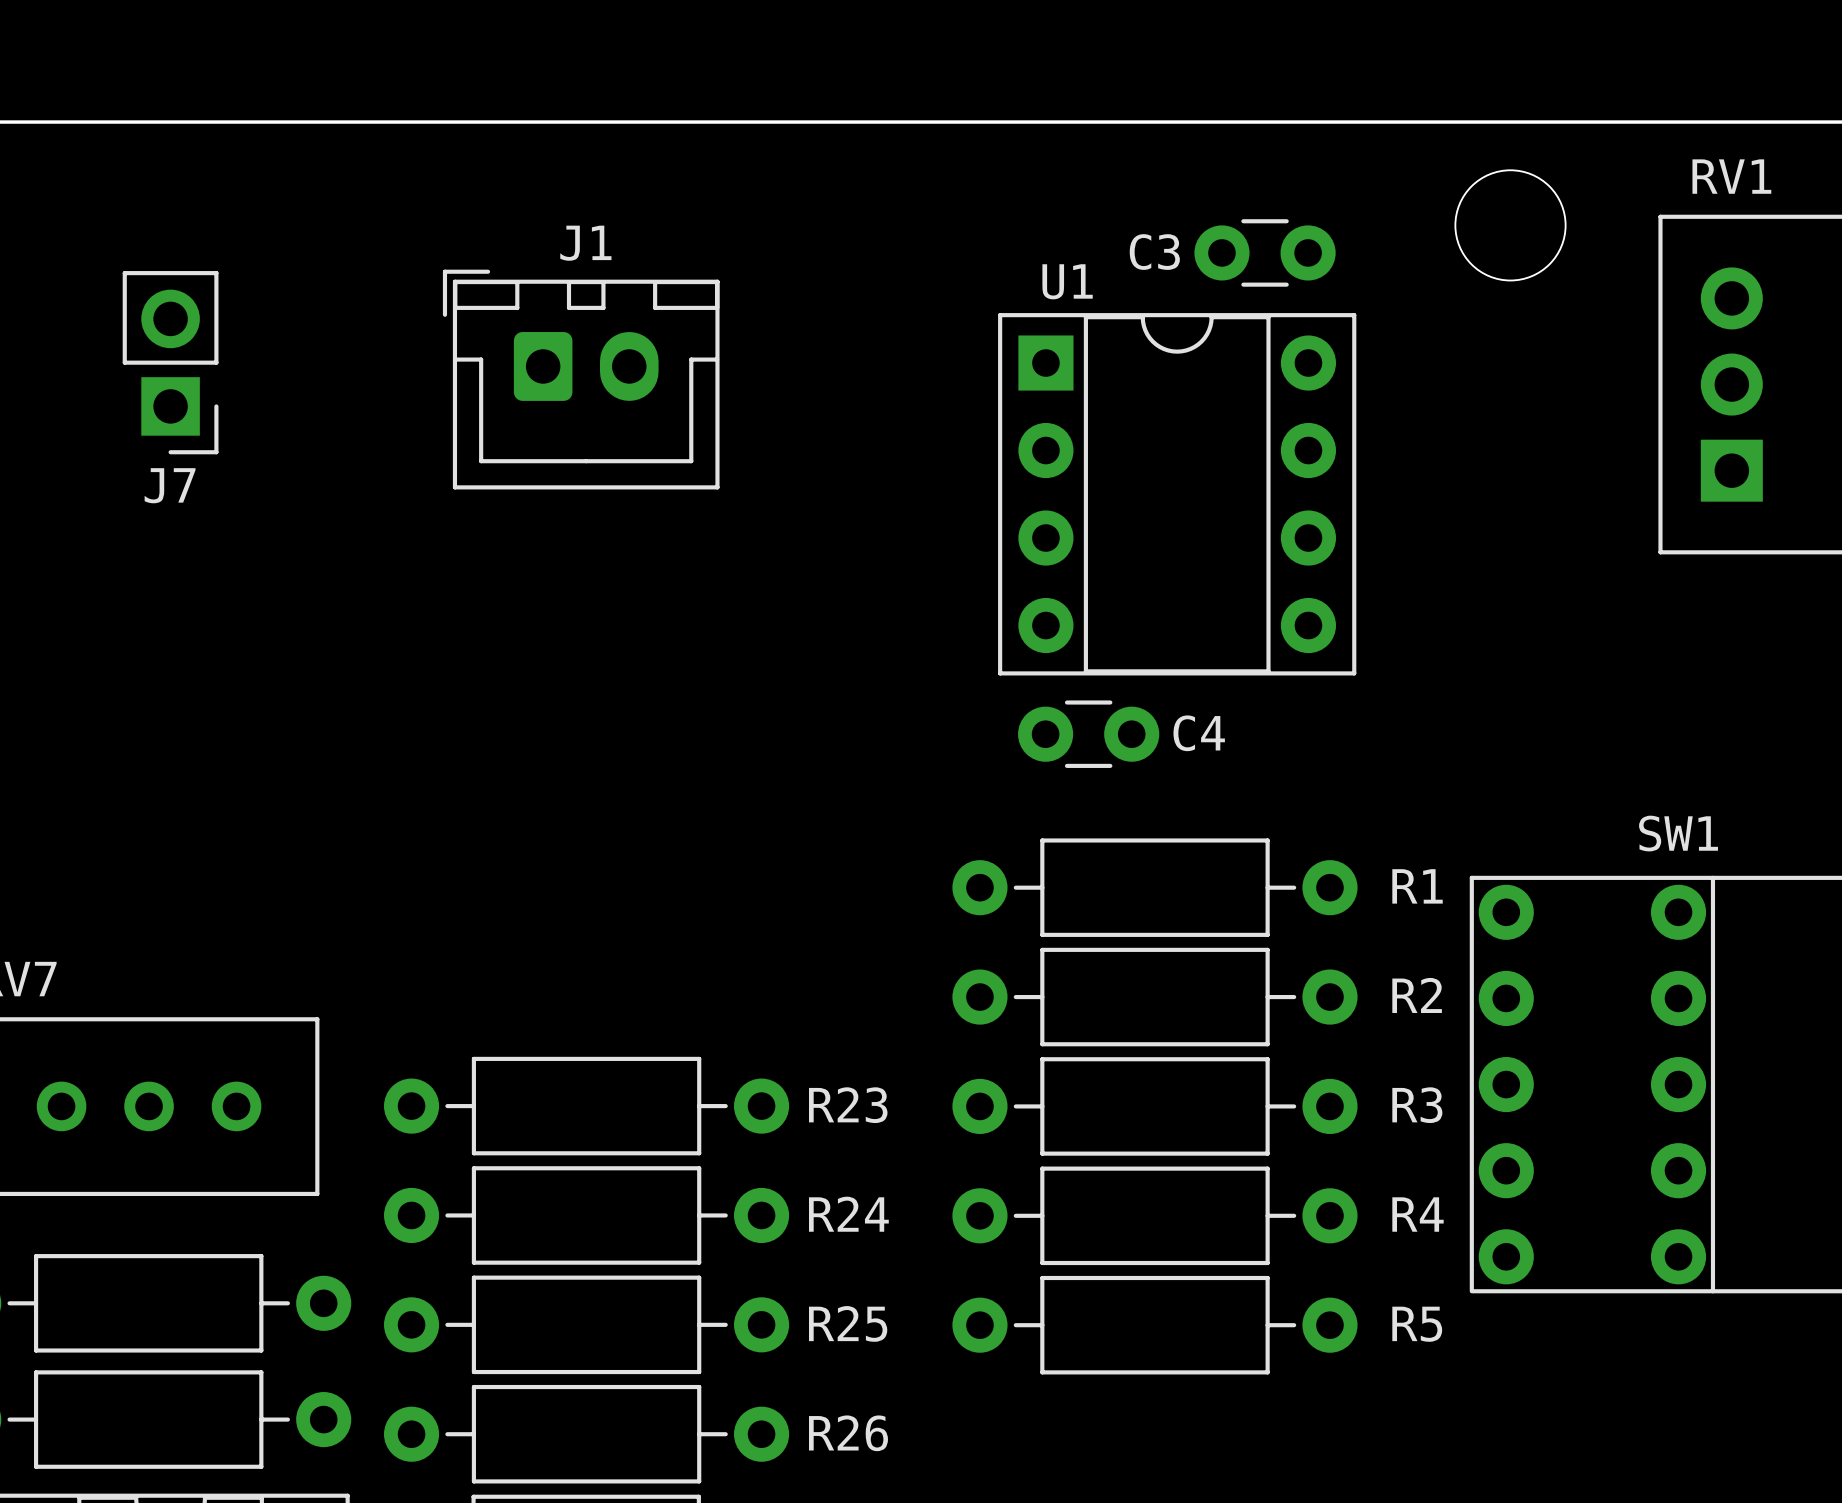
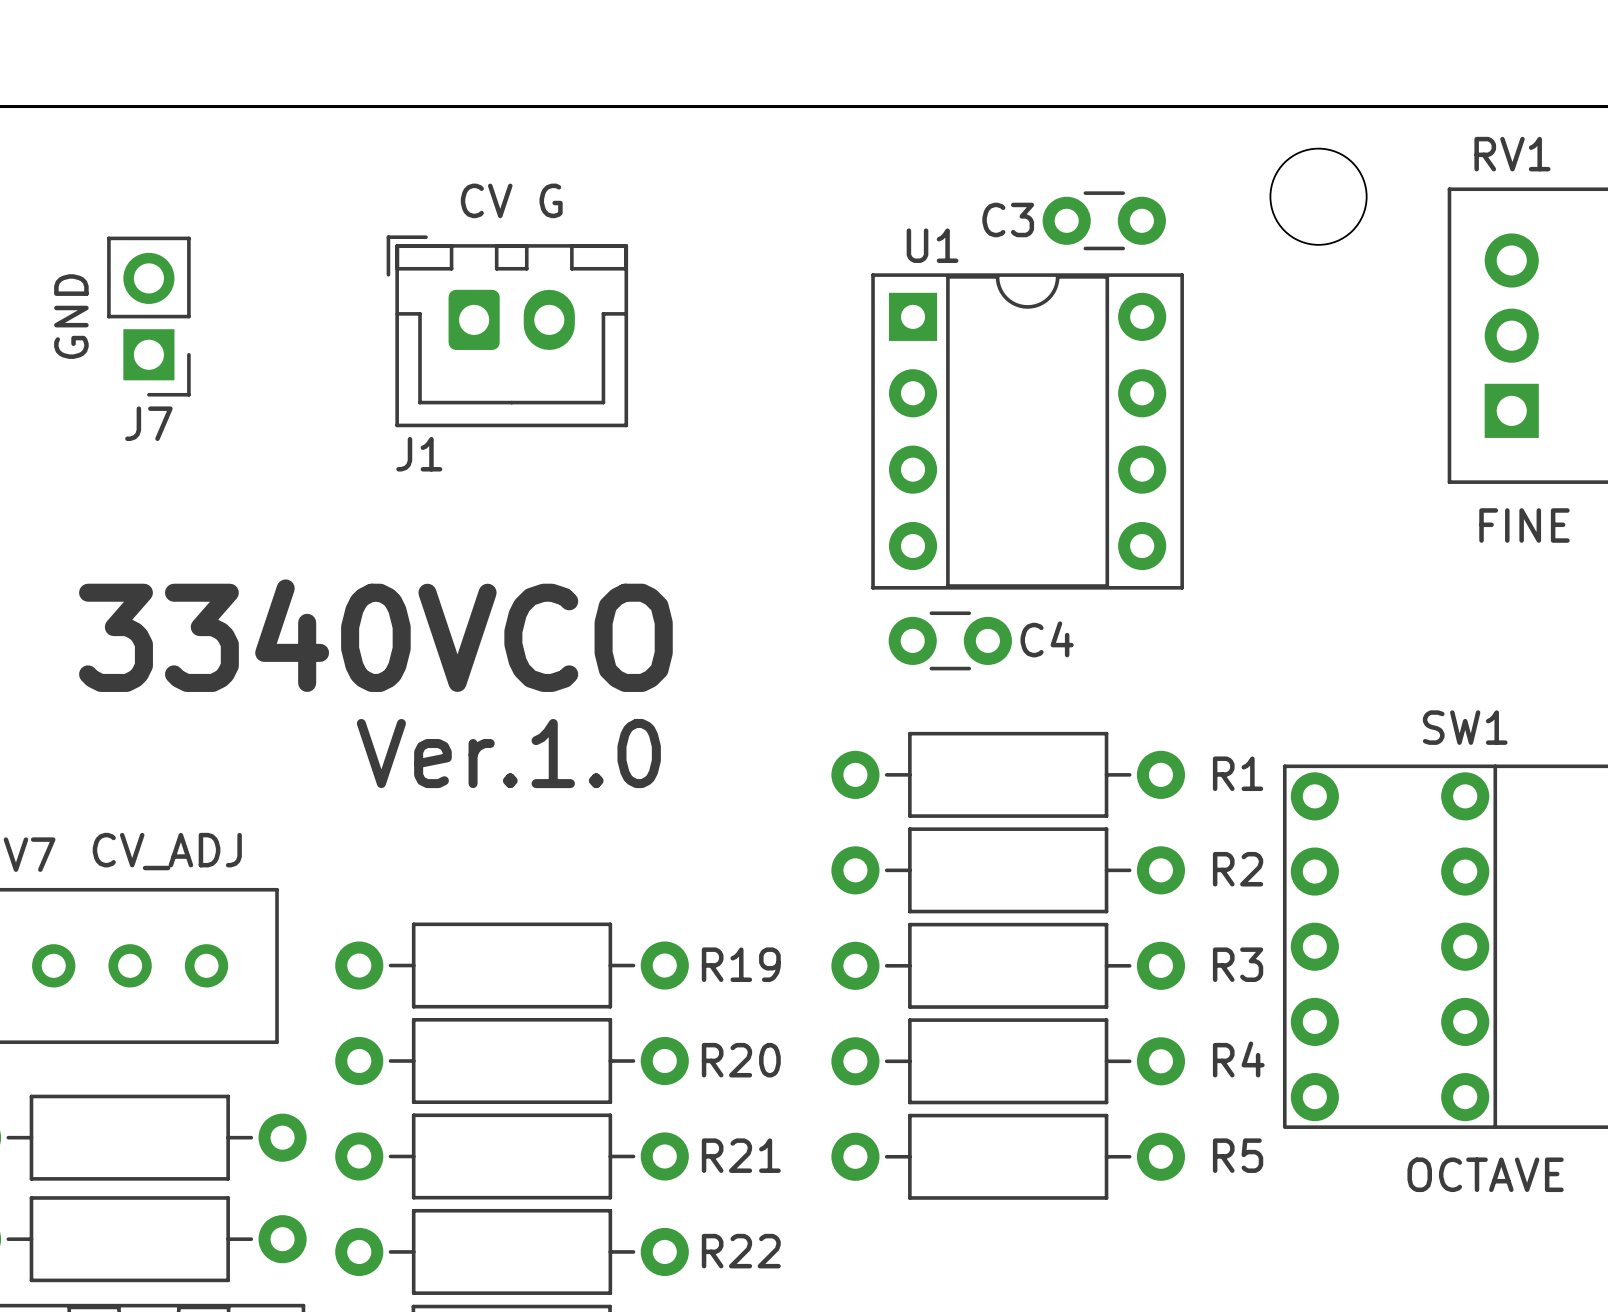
text: none -> CV G (511, 200)
J1 name position: J1 (585, 243) -> J1 (419, 454)
text: none -> GND (71, 316)
text: none -> FINE (1524, 525)
text: none -> 3340VCO (375, 635)
text: none -> Ver.1.0 (508, 753)
text: none -> CV_ADJ (167, 851)
R23 name: R23 (848, 1105) -> R19 (741, 964)
R24 name: R24 (848, 1214) -> R20 (741, 1060)
R25 name: R25 (848, 1323) -> R21 (741, 1155)
text: none -> OCTAVE (1485, 1174)
R26 name: R26 (848, 1433) -> R22 (741, 1251)

